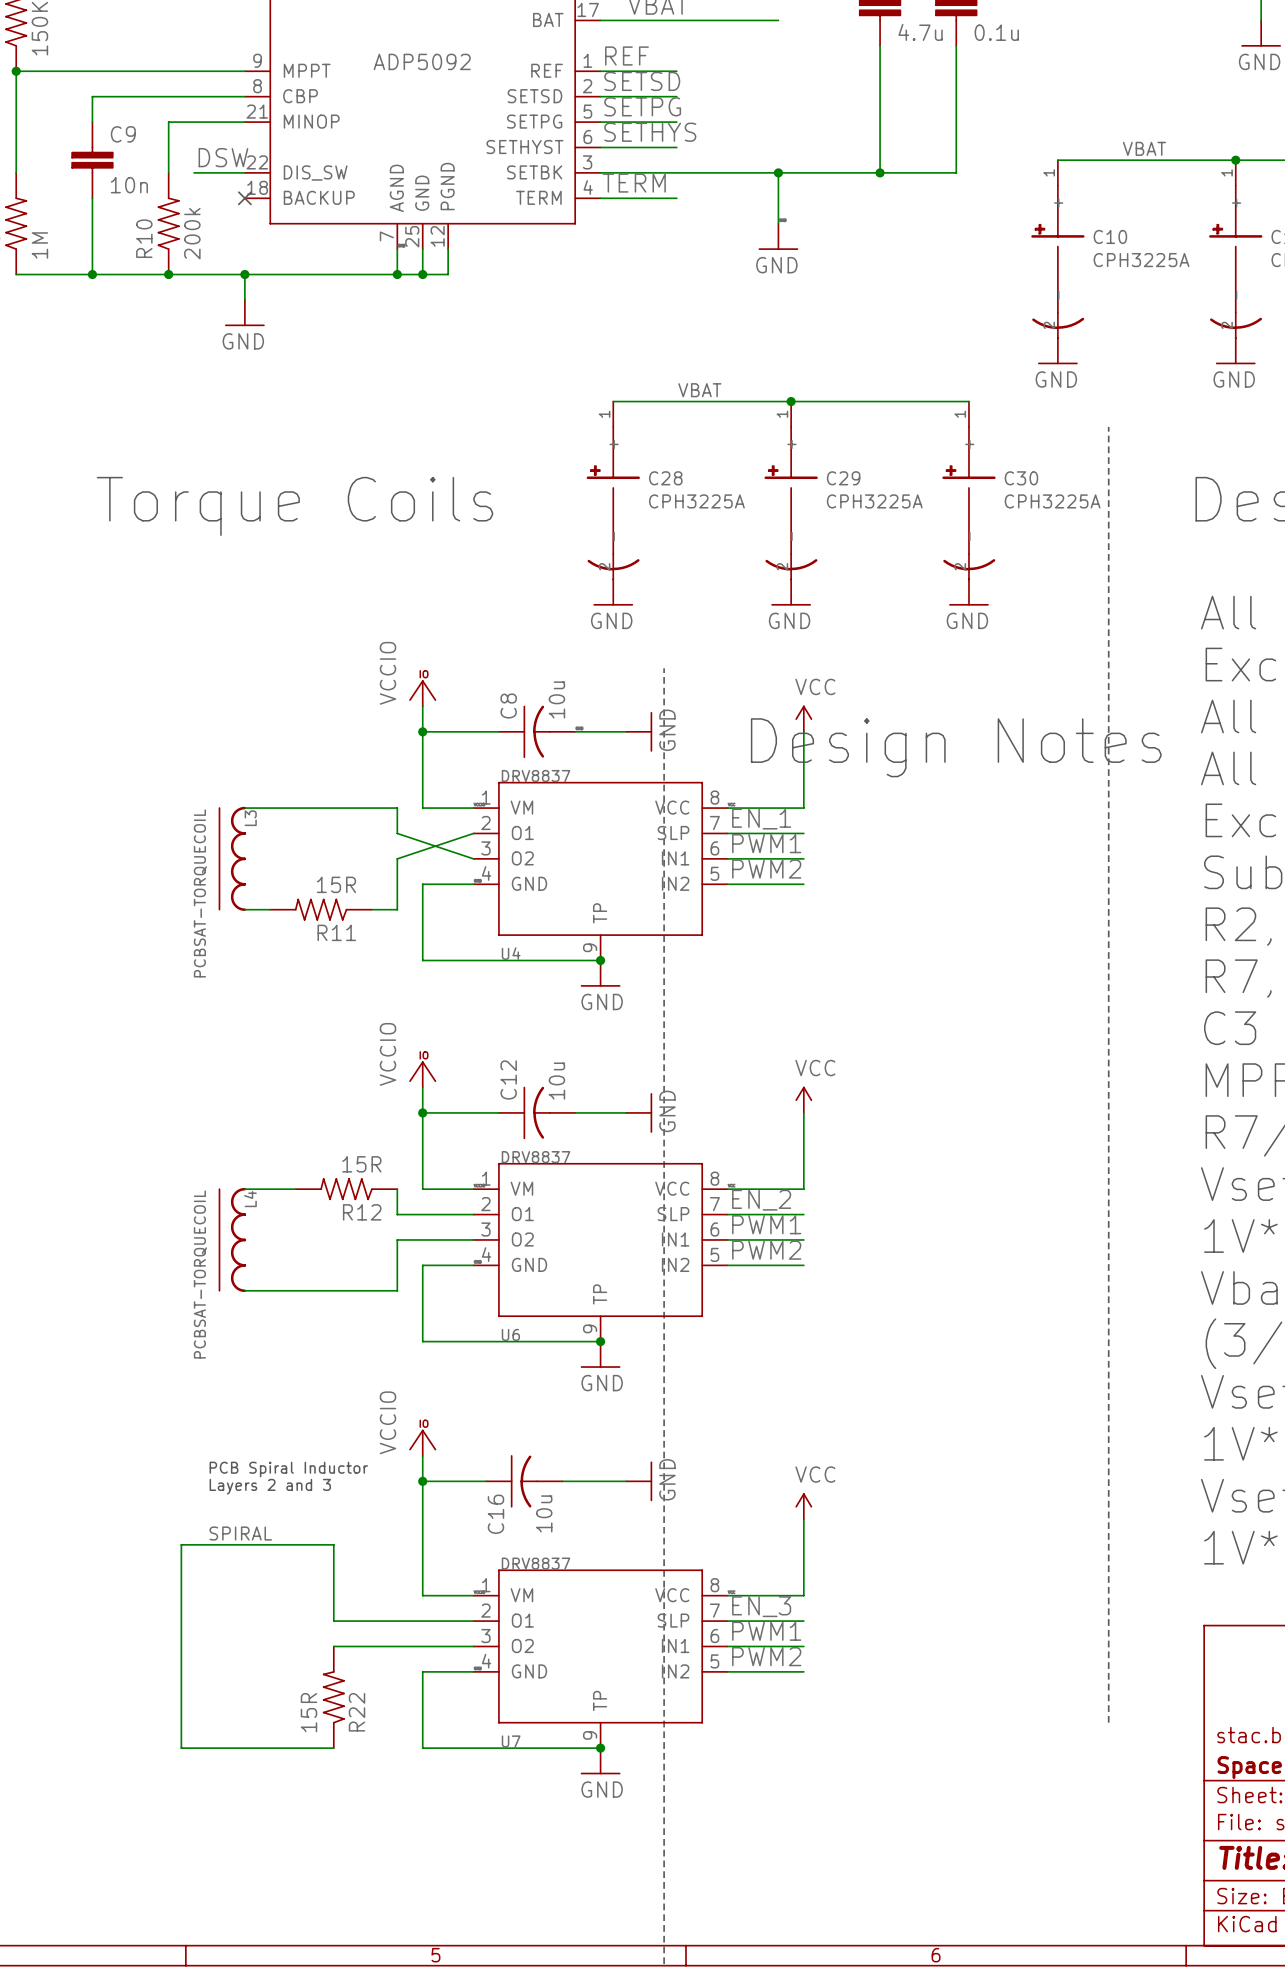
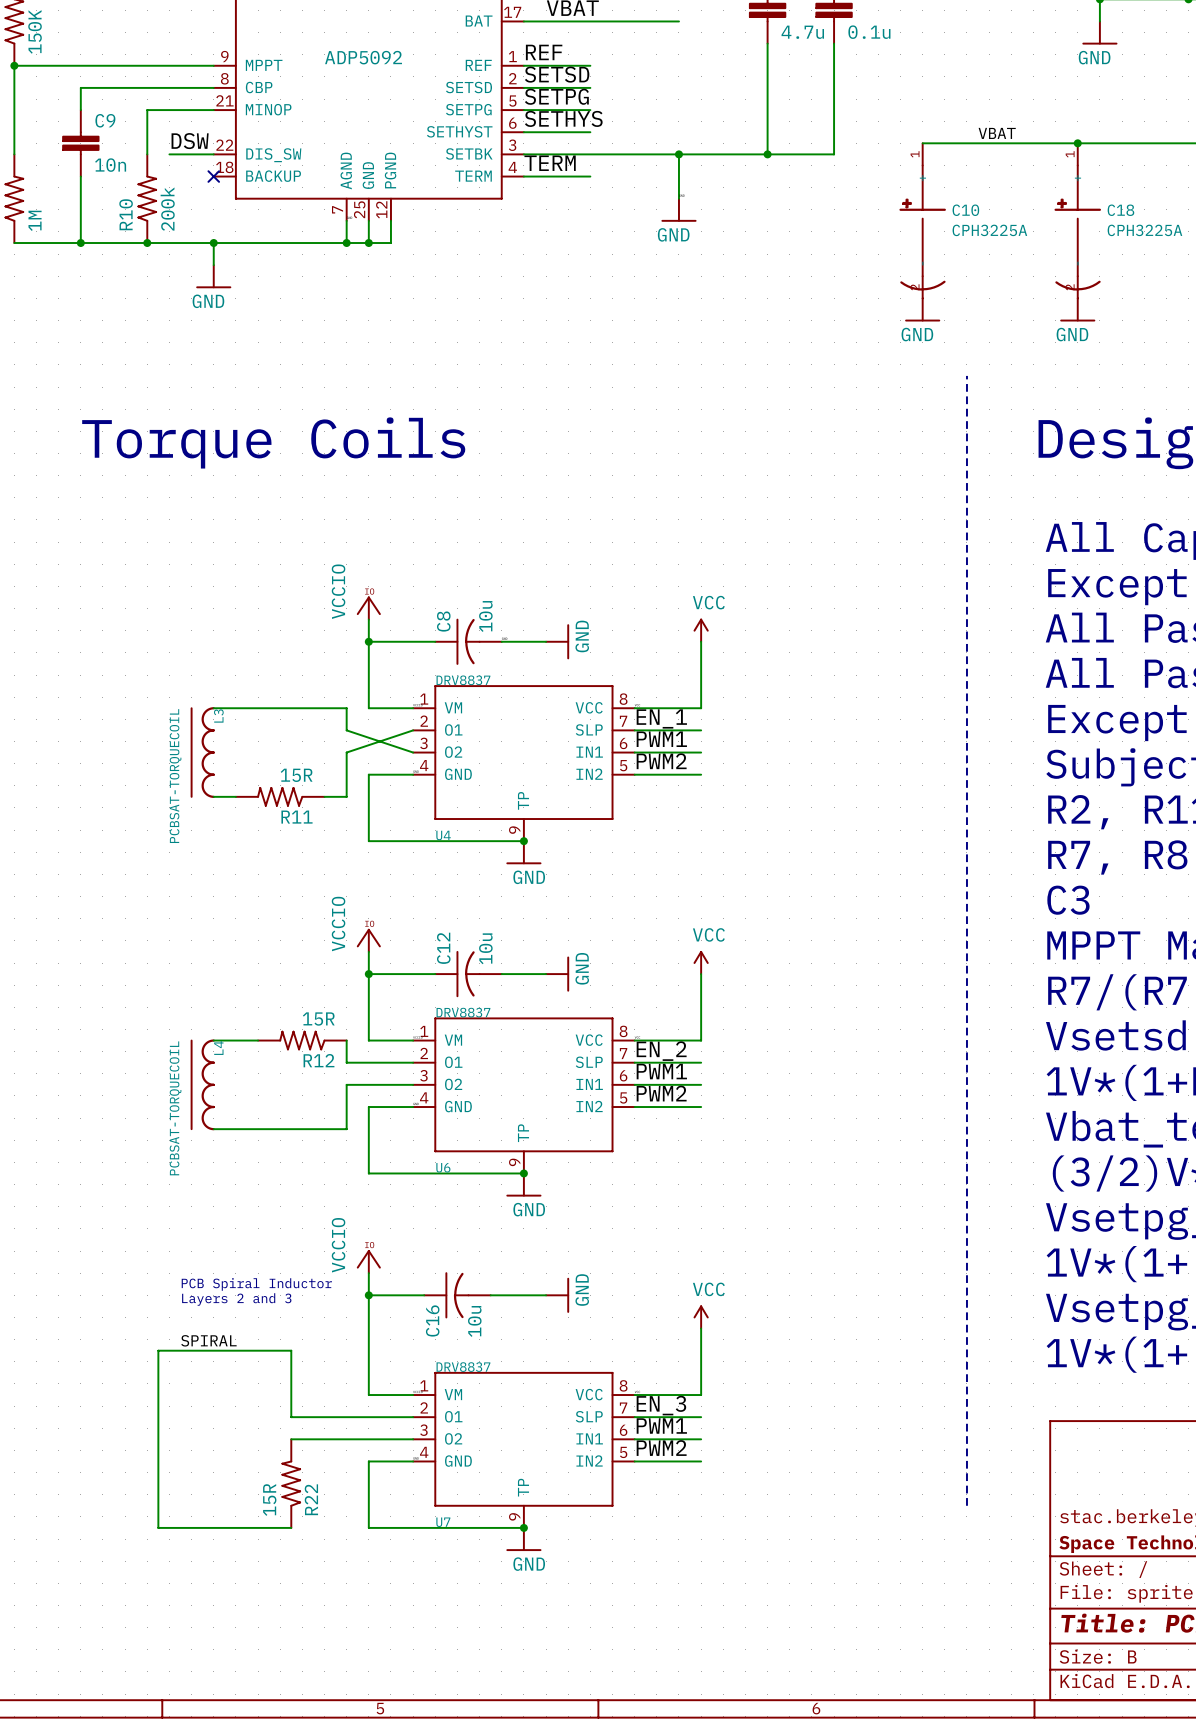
label: VBAT (699, 390) -> none
wire: (613, 401) (968, 401) -> none
junction: (791, 401) -> none
C28: CPH3225A (613, 490) -> none
C29: CPH3225A (791, 490) -> none
C30: CPH3225A (968, 490) -> none
power symbol: GND (613, 592) -> none
power symbol: GND (791, 592) -> none
power symbol: GND (968, 592) -> none
line: (664, 668) (664, 1964) -> none
text: Design Notes (956, 747) -> none

